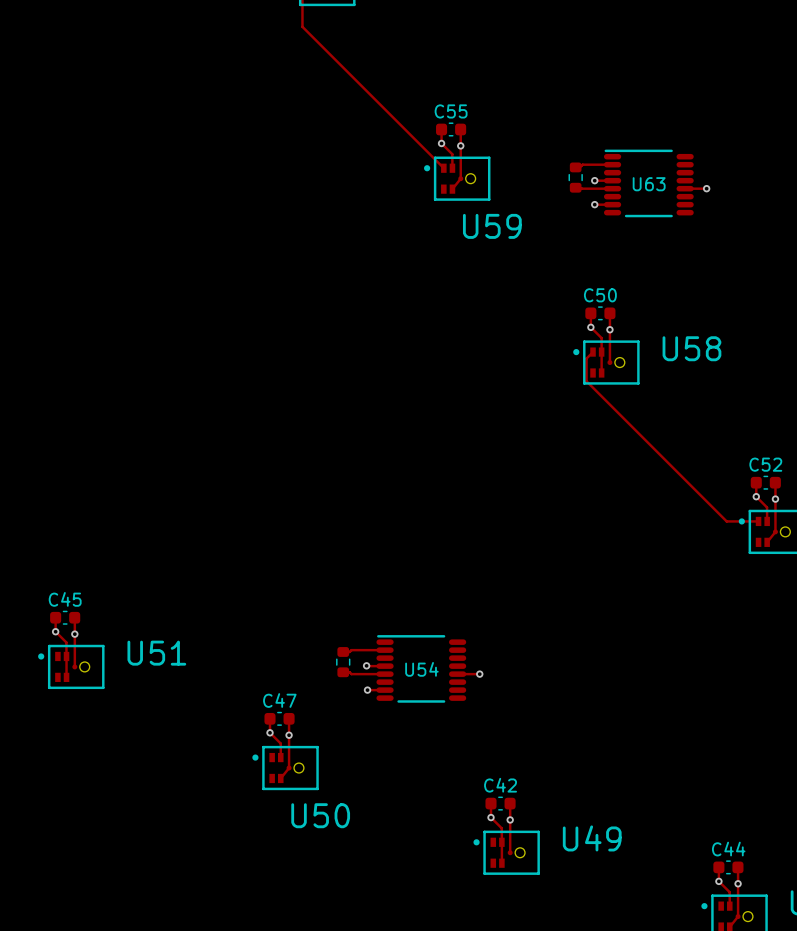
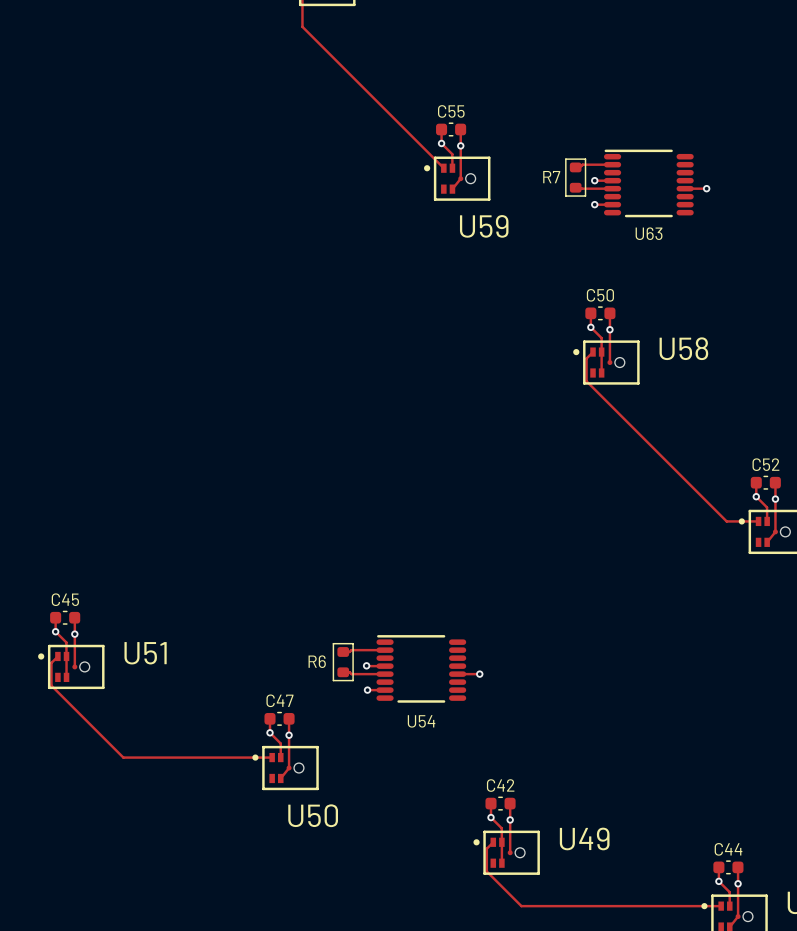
part: (575, 177) -> none
R7: none -> (575, 177)
U63 name position: U63 (649, 184) -> U63 (649, 233)
top track: none -> (57, 656) (51, 662) (51, 685) (123, 757) (272, 757)
part: (343, 662) -> none
R6: none -> (343, 662)
U54 name position: U54 (421, 669) -> U54 (421, 721)
top track: none -> (493, 842) (486, 848) (486, 871) (521, 906) (721, 906)

